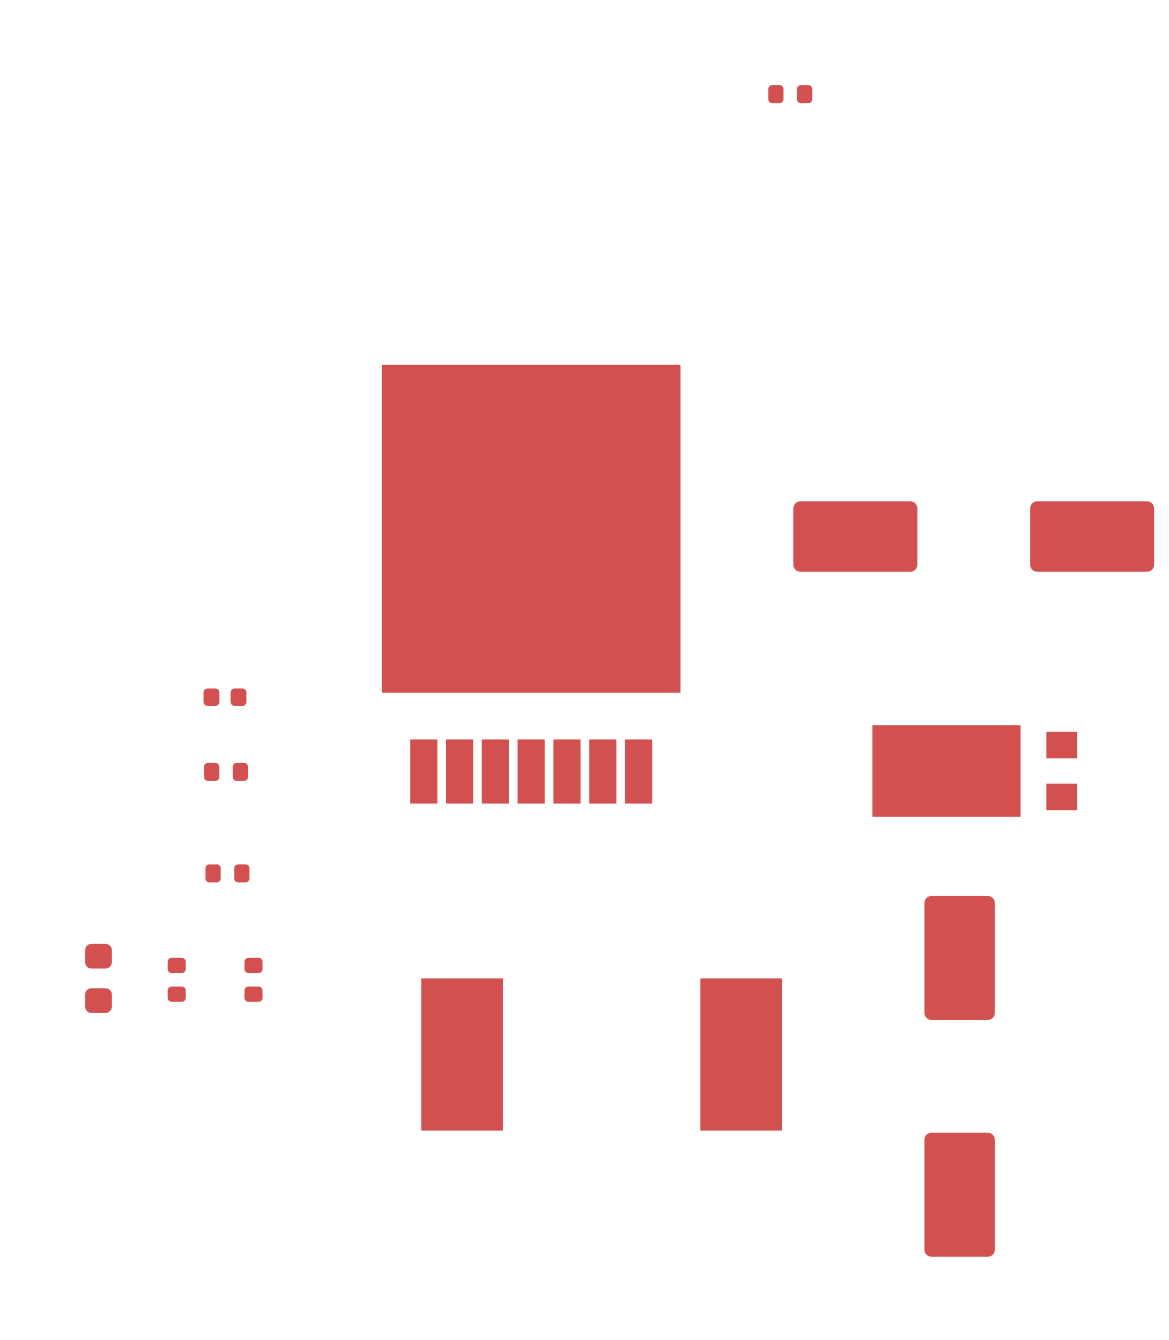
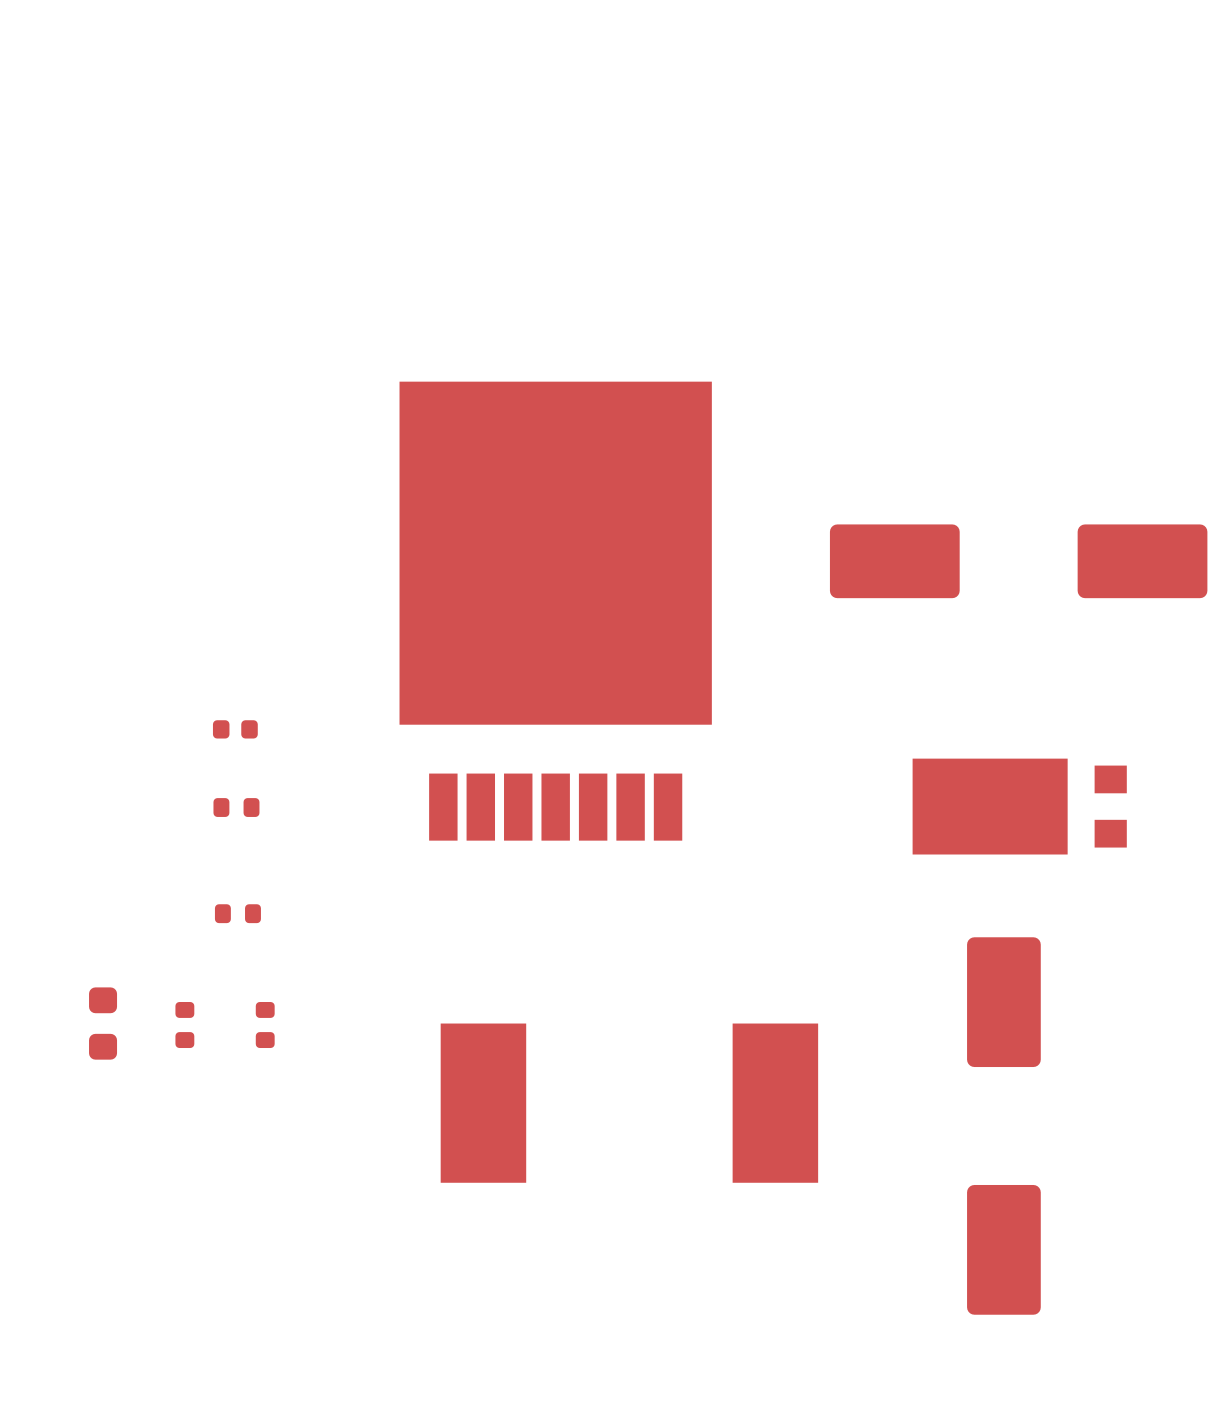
part: (790, 94) -> none

